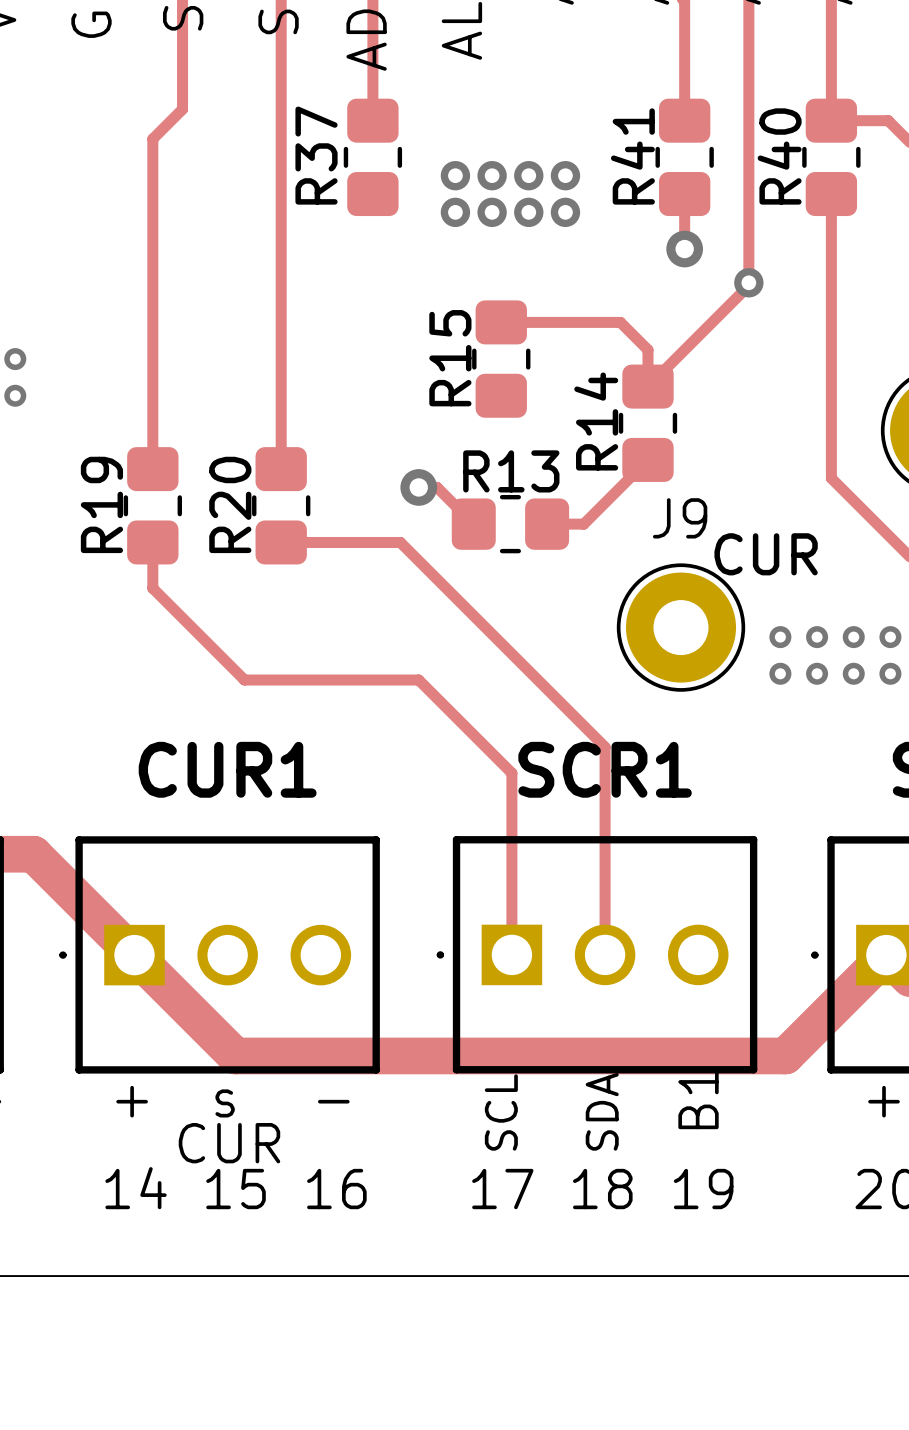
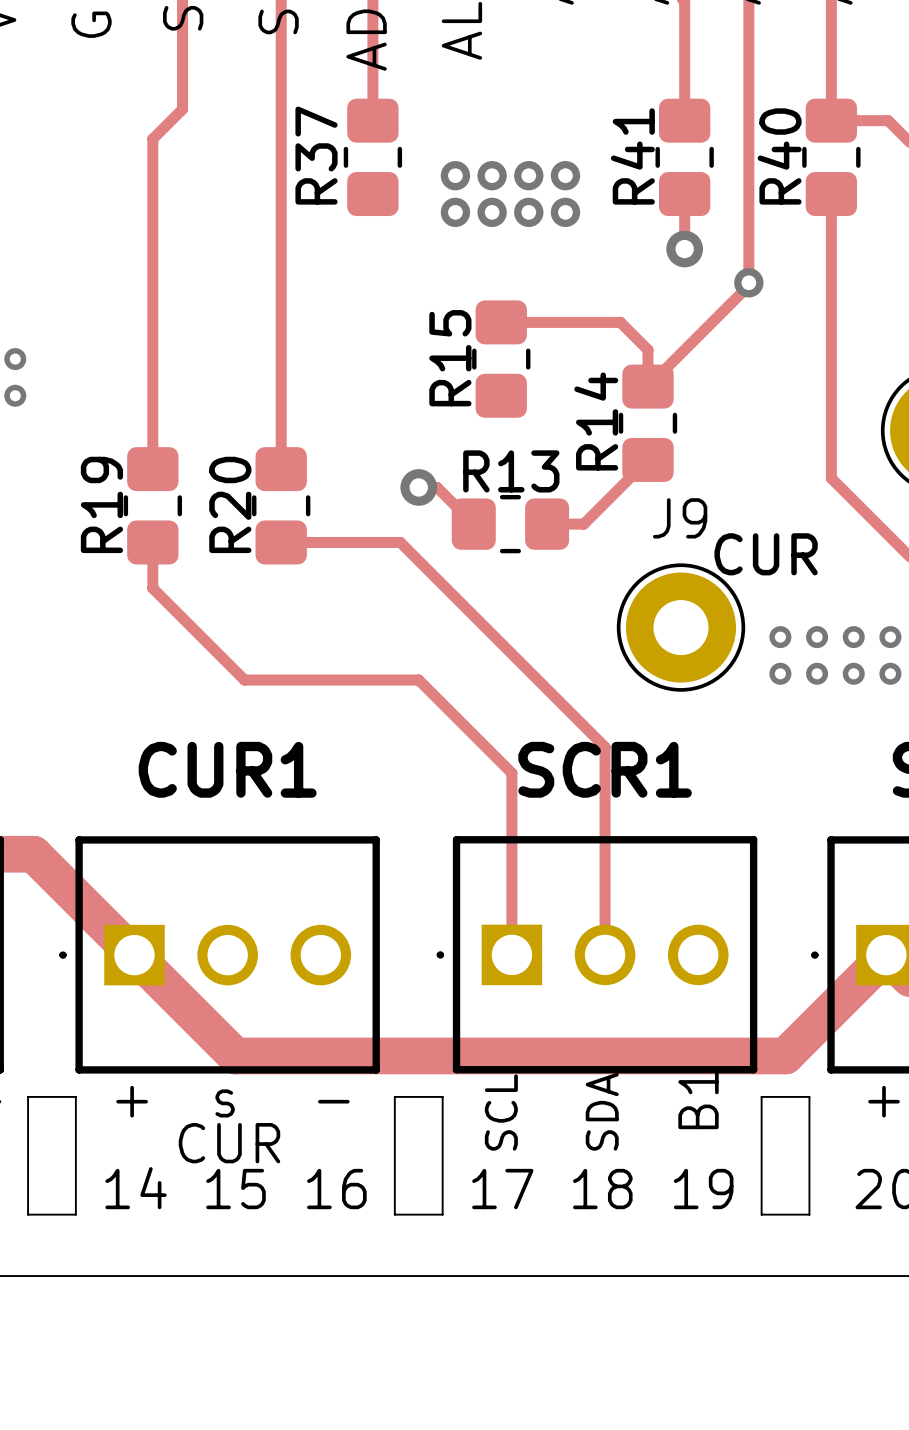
board edge: none -> (28, 1096) (75, 1096) (75, 1214) (28, 1214) (28, 1096)
board edge: none -> (394, 1096) (442, 1096) (442, 1214) (394, 1214) (394, 1096)
board edge: none -> (761, 1096) (809, 1096) (809, 1214) (761, 1214) (761, 1096)

